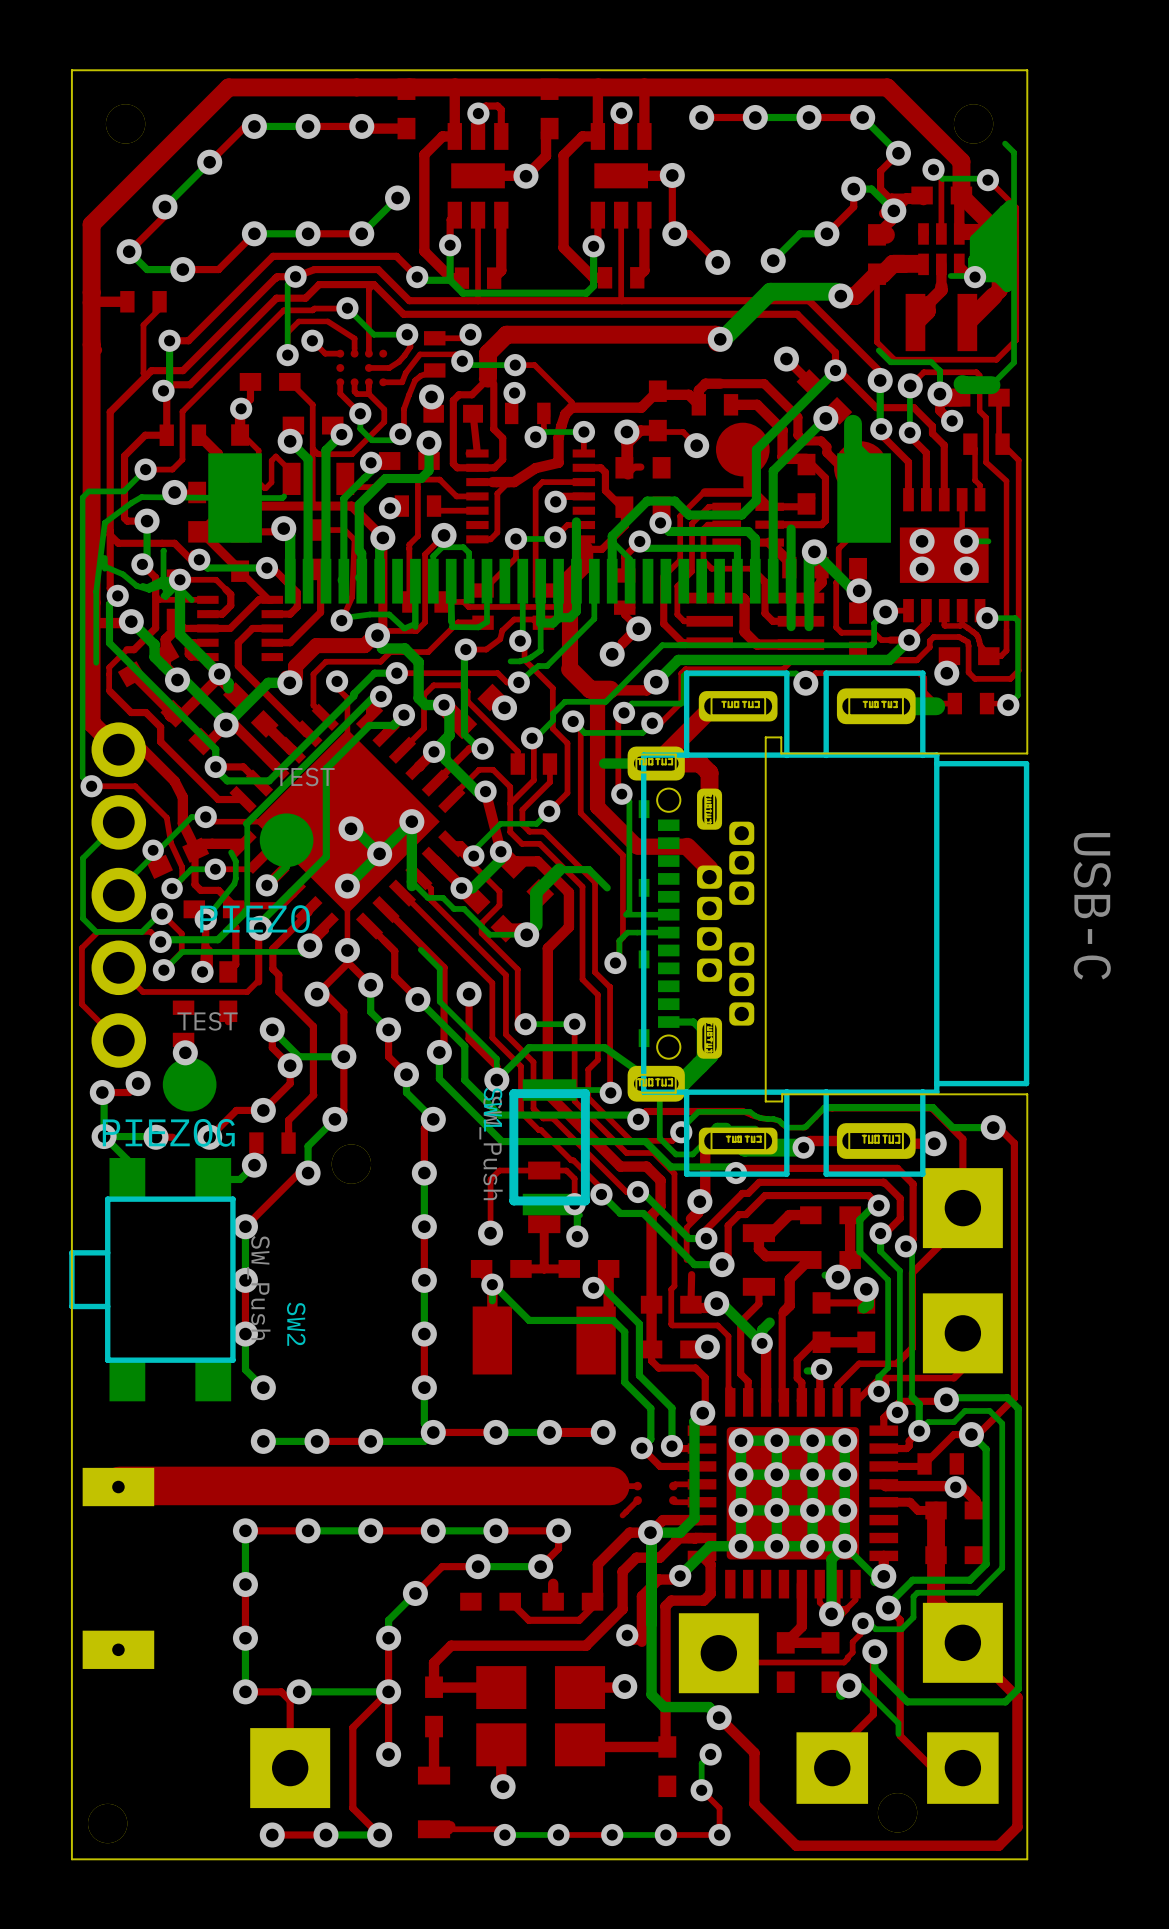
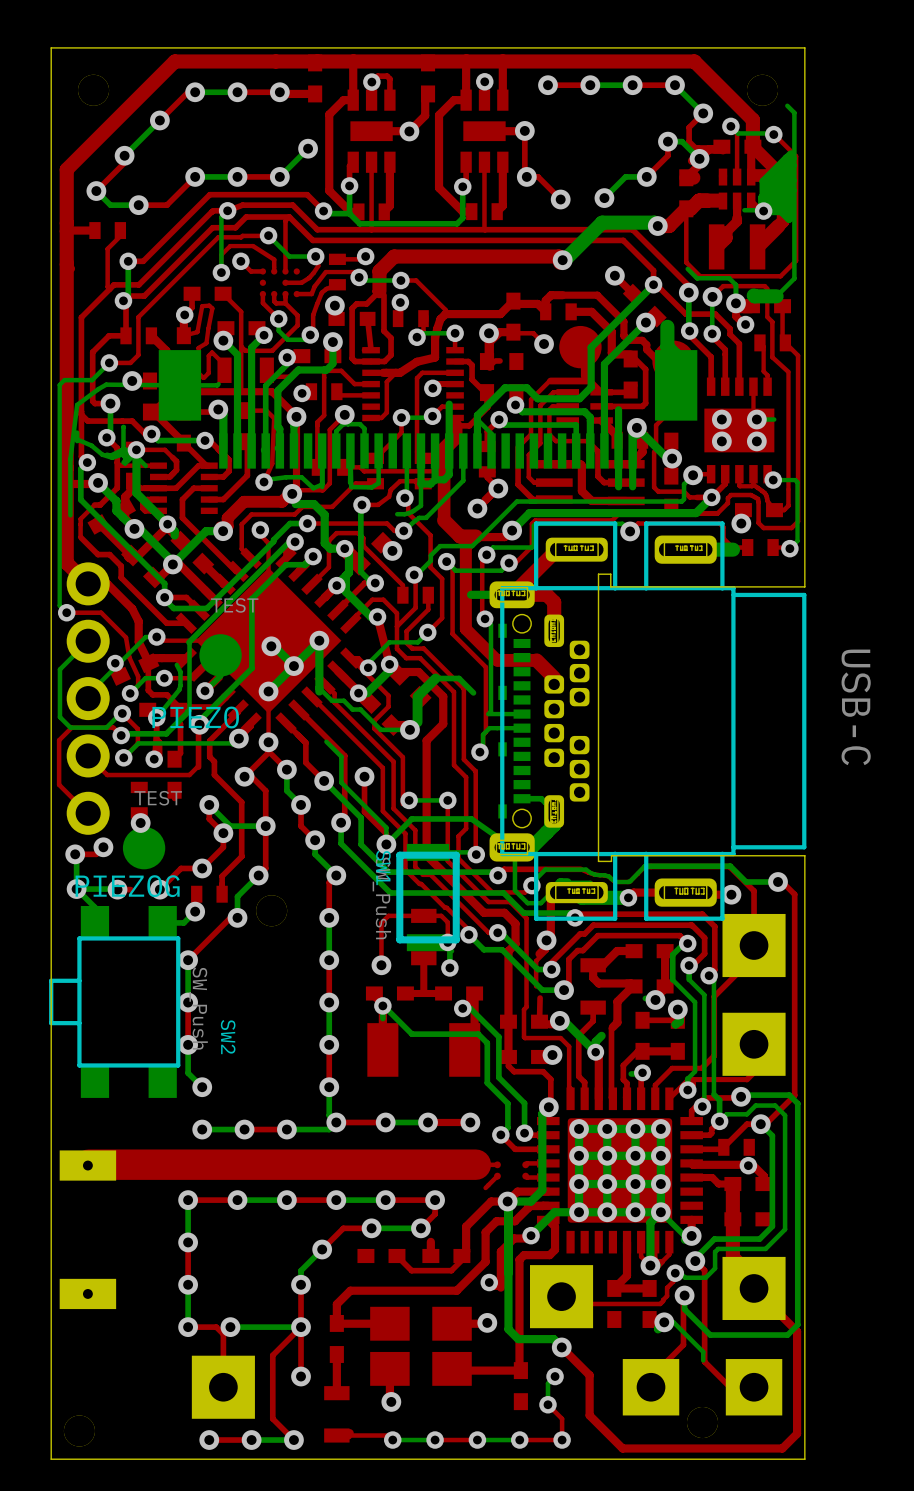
top track: (243, 435) (258, 450) -> (183, 335) (197, 332) (202, 306) (209, 305) (212, 308) (206, 343) (198, 347)

